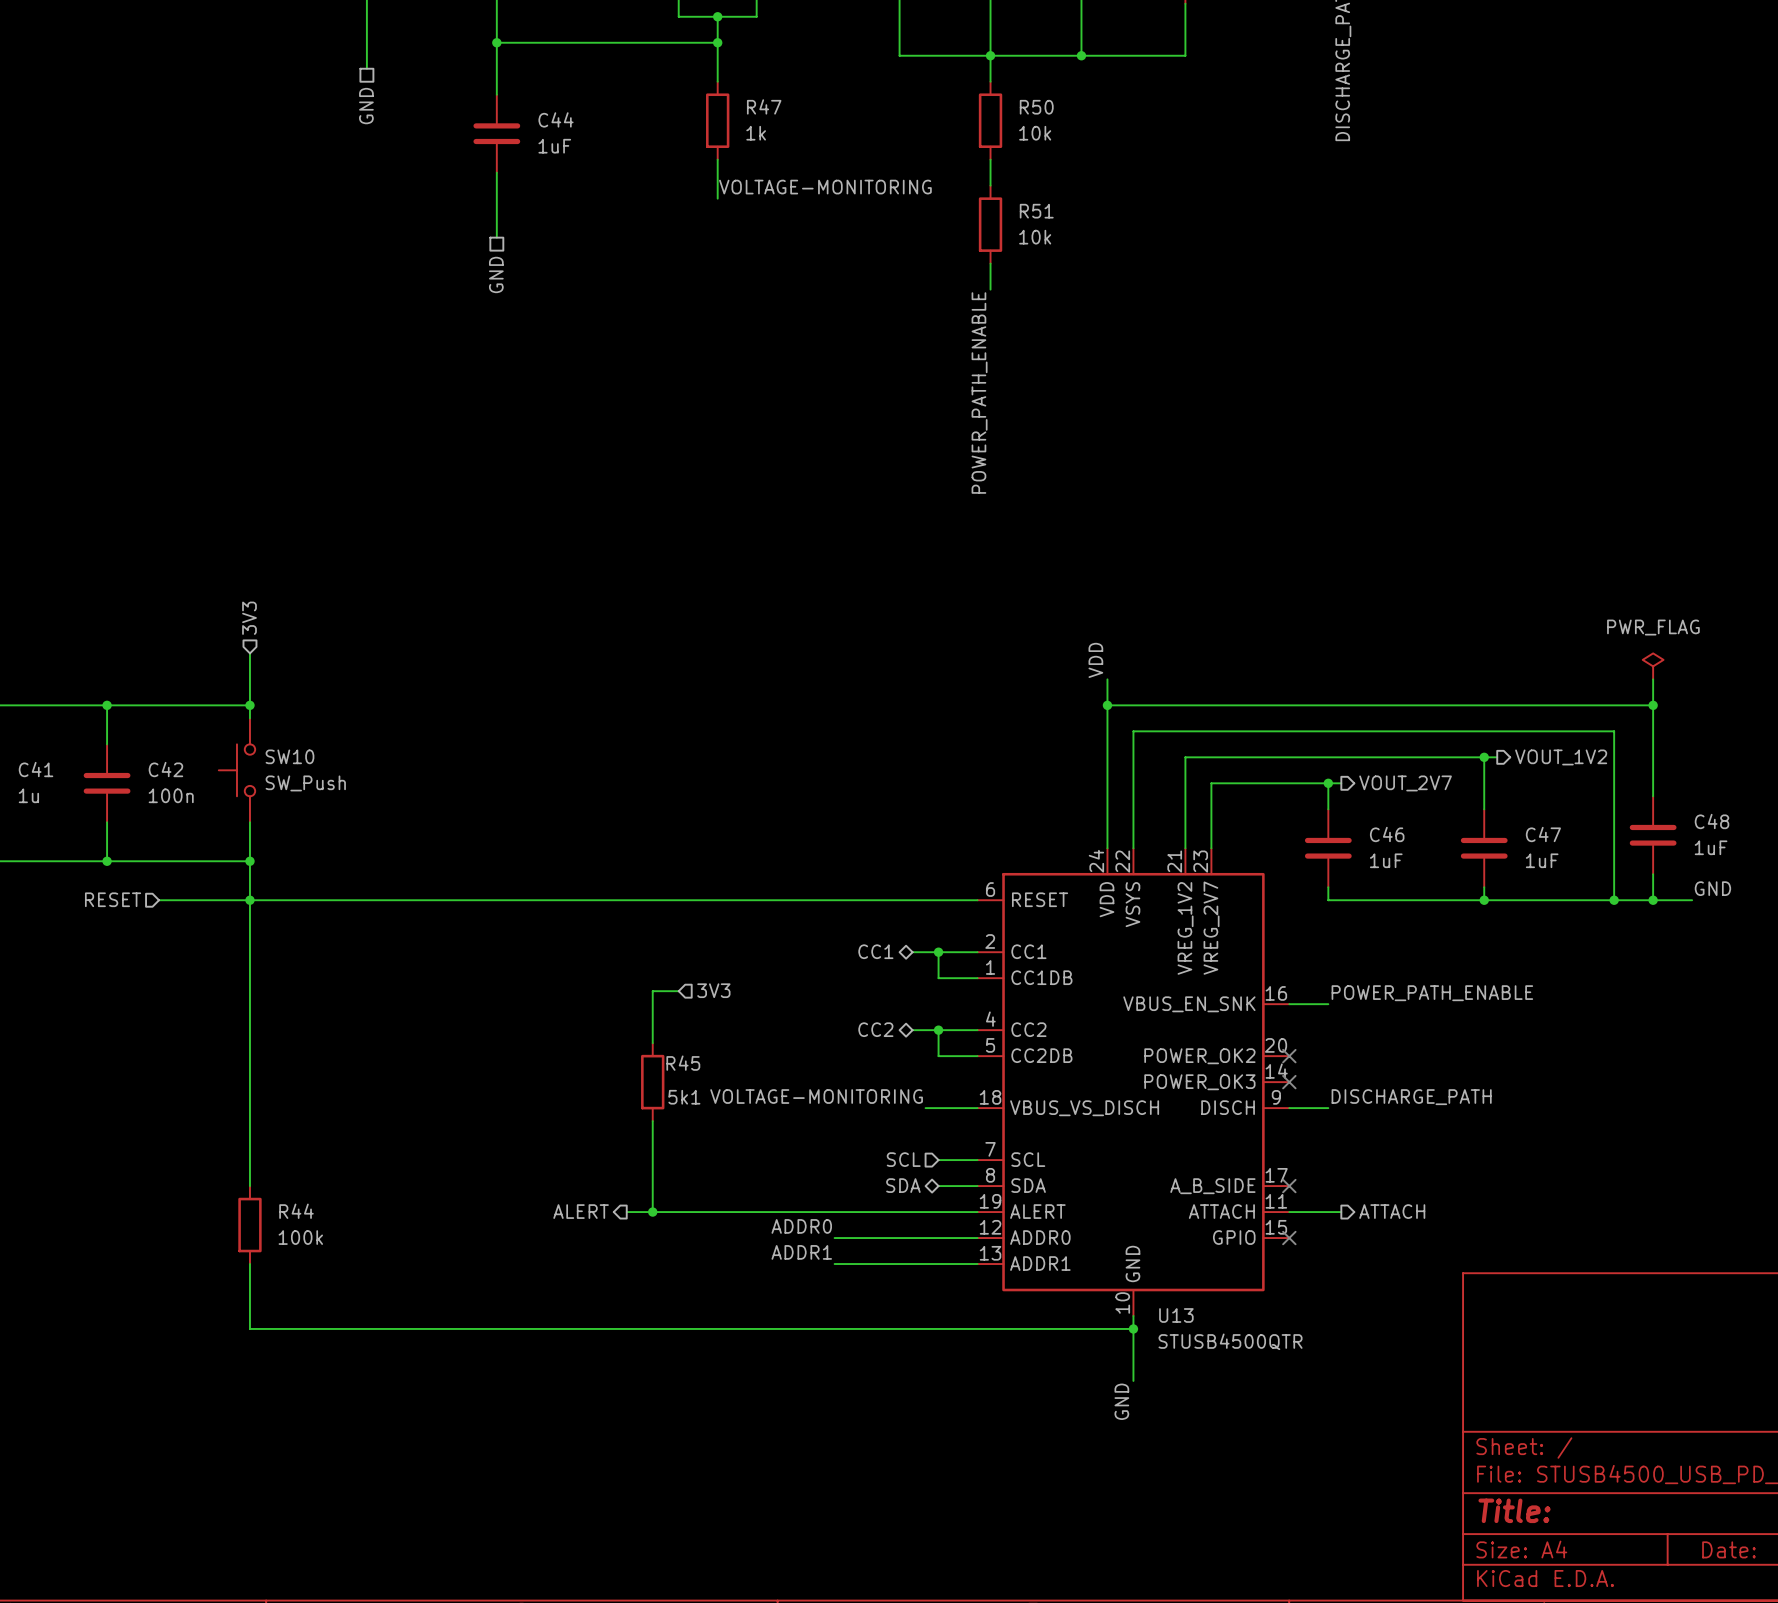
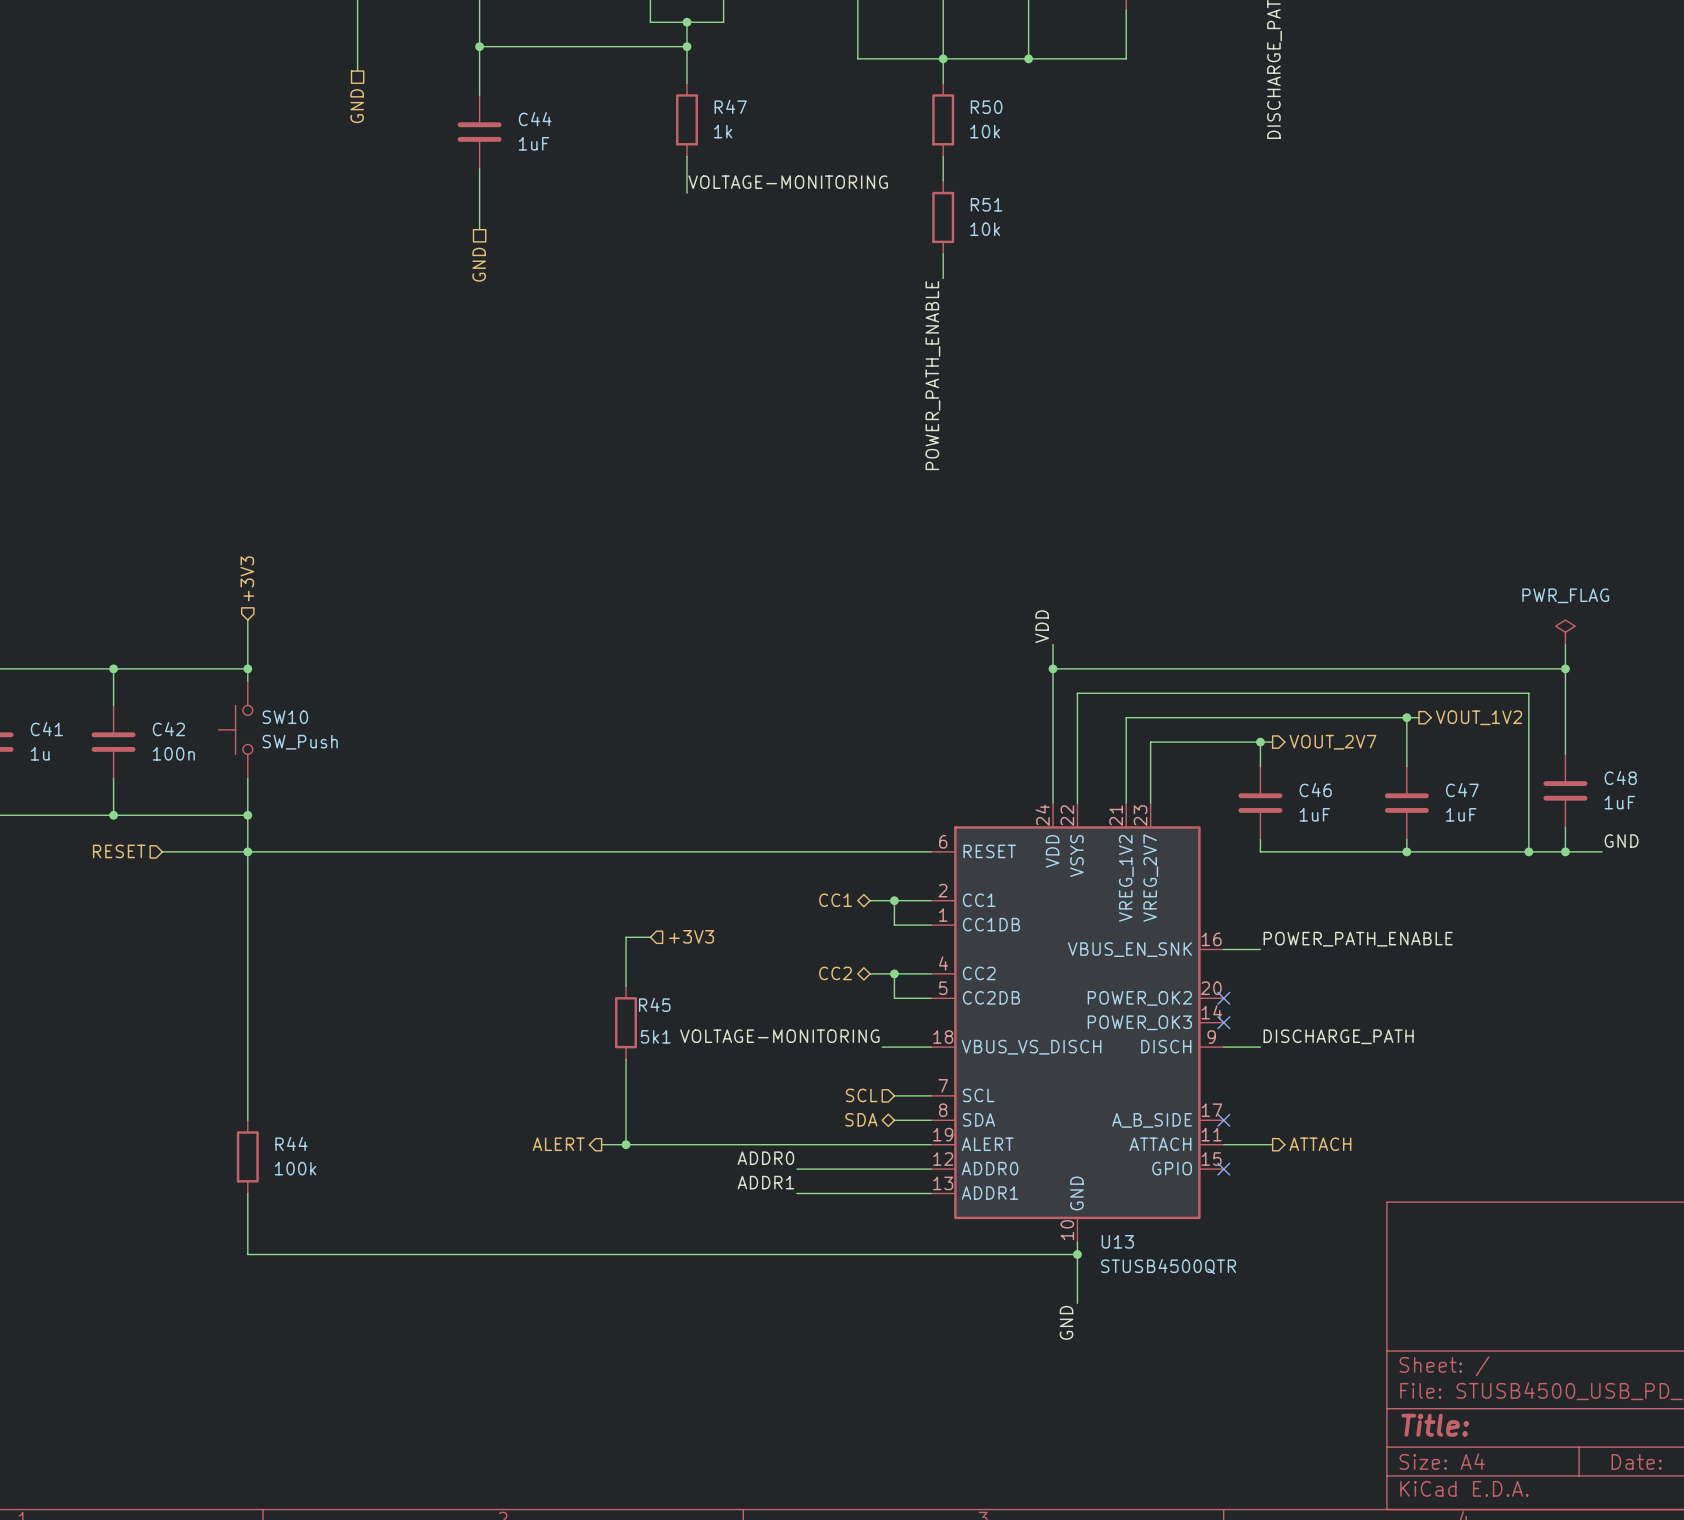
hierarchical label: 3V3 (249, 618) -> +3V3 (247, 578)
hierarchical label: 3V3 (713, 990) -> +3V3 (691, 936)

